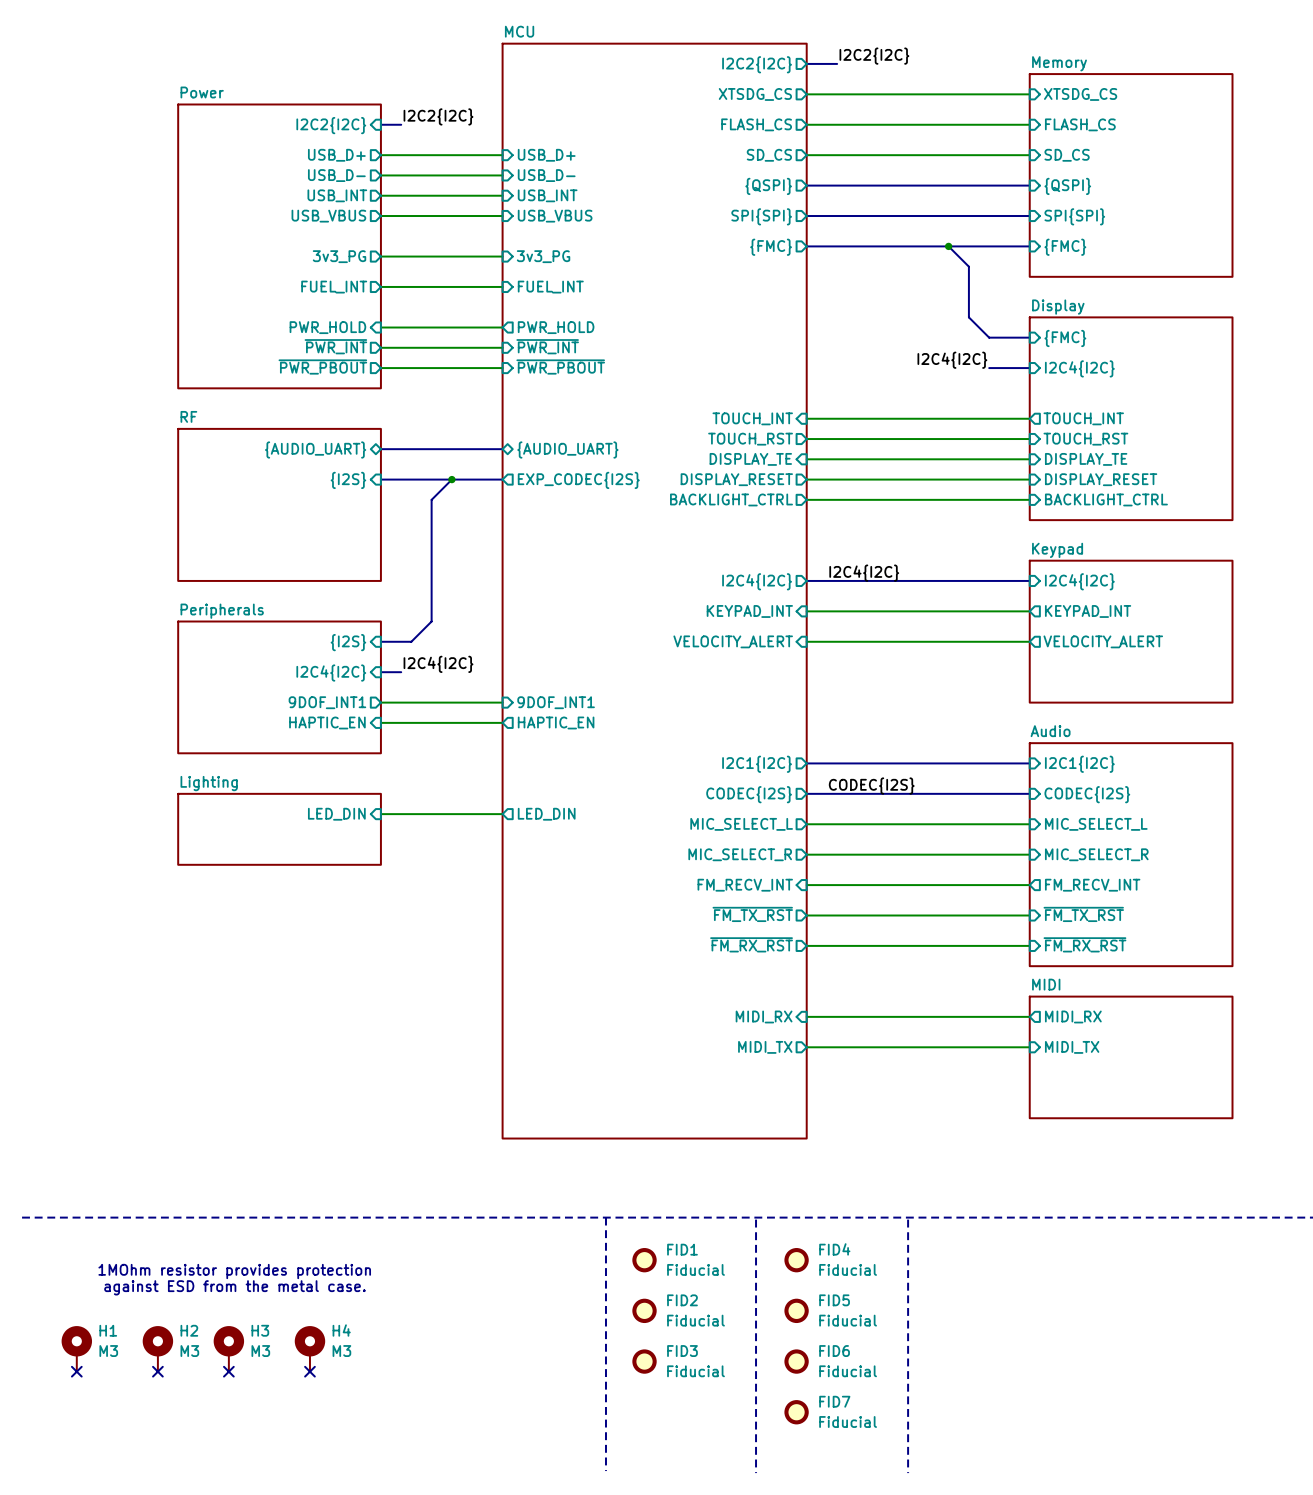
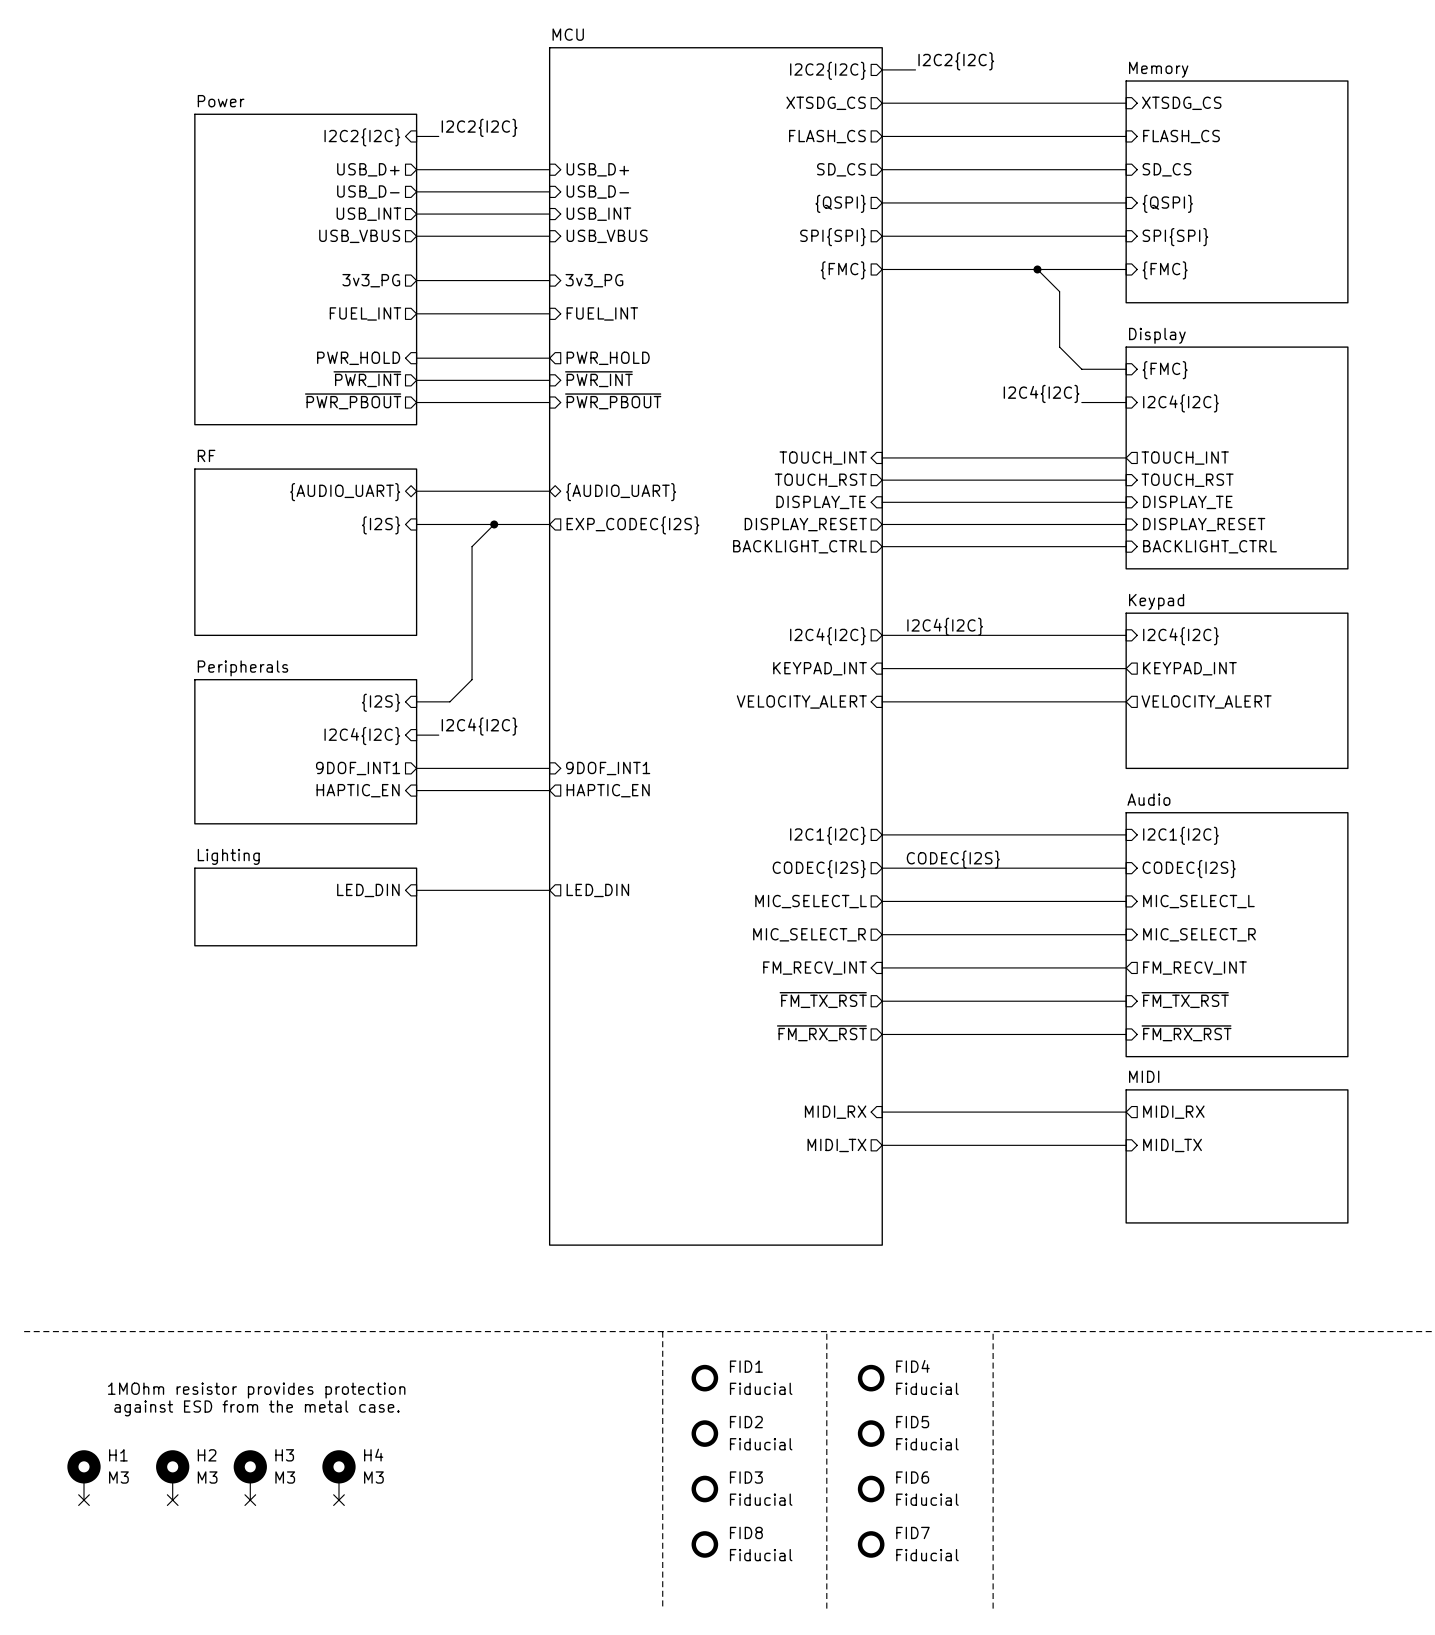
FID8: none -> Fiducial (704, 1544)

